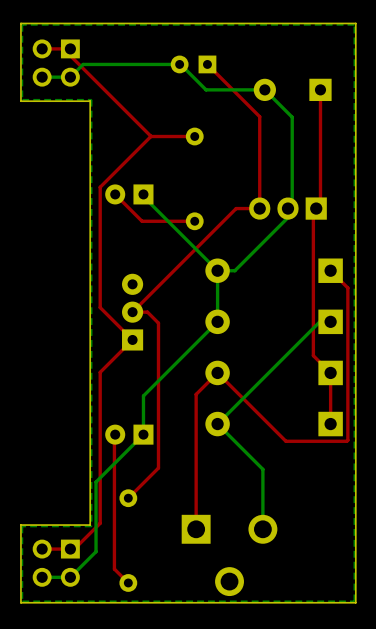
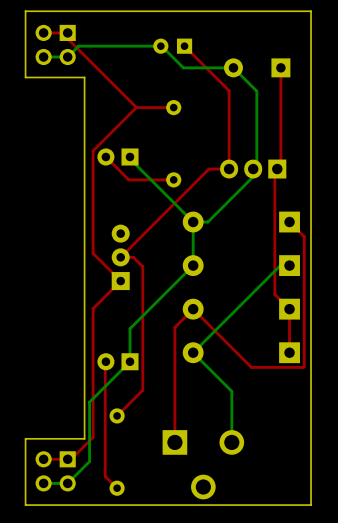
bottom zone outline: (354, 24) (354, 601) (22, 601) (22, 526) (91, 526) (91, 99) (22, 99) (22, 24) (354, 24) -> none

